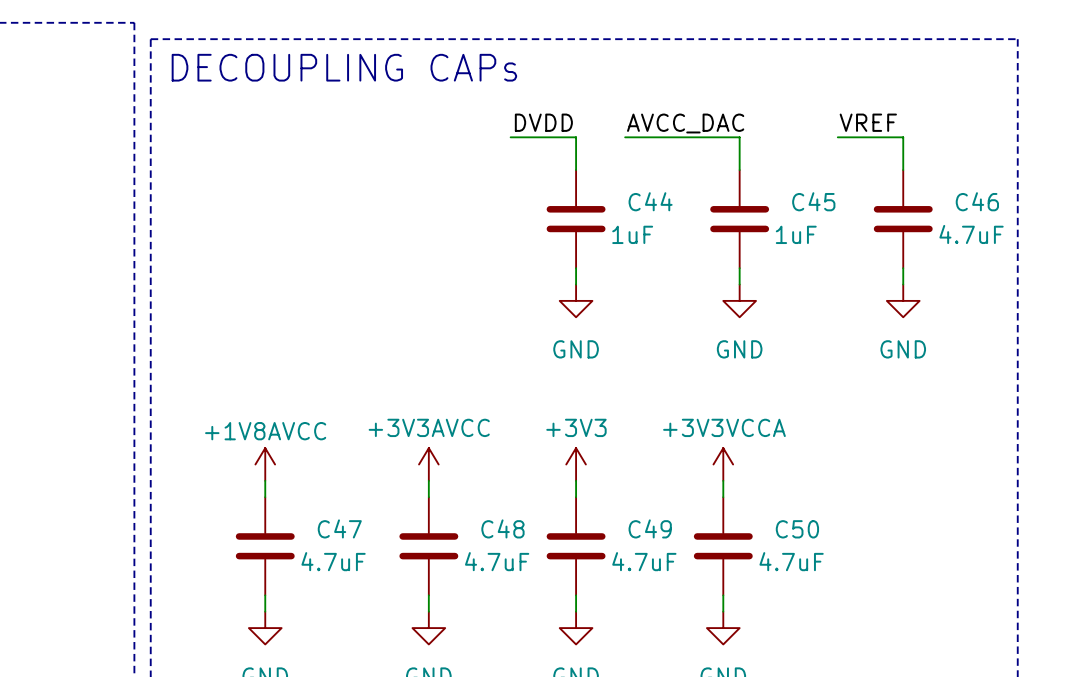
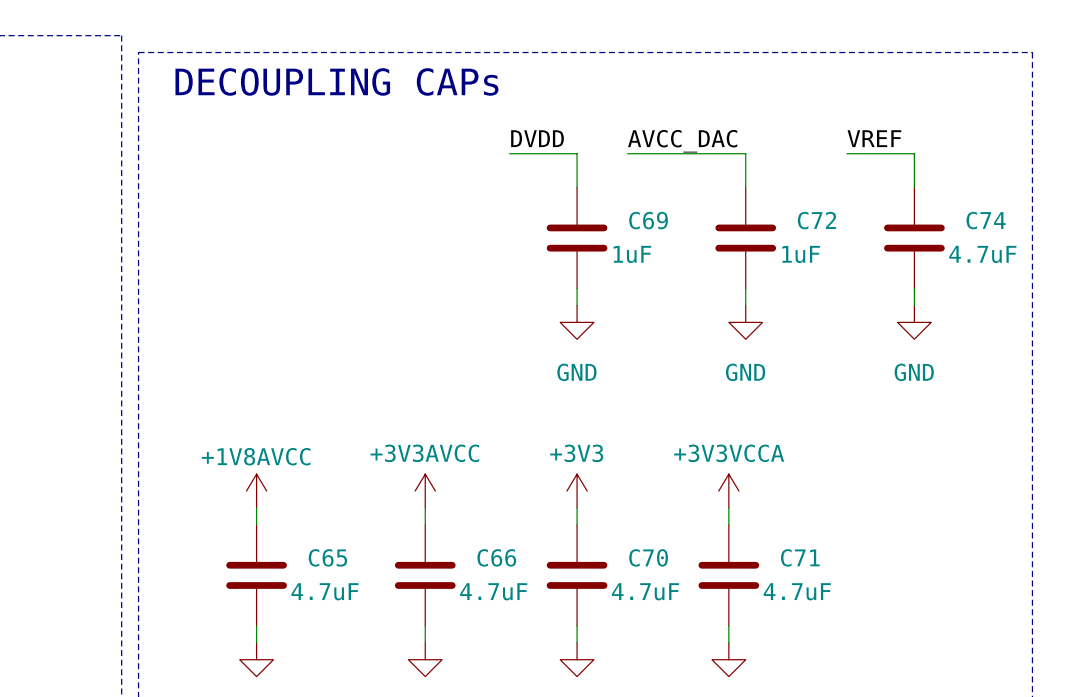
C44 name: C44 (650, 201) -> C69 (648, 220)
C45 name: C45 (813, 201) -> C72 (817, 220)
C46 name: C46 (977, 201) -> C74 (986, 220)
C47 name: C47 (339, 528) -> C65 (327, 557)
C48 name: C48 (502, 528) -> C66 (496, 557)
C49 name: C49 (650, 528) -> C70 (648, 557)
C50 name: C50 (797, 529) -> C71 (800, 557)

